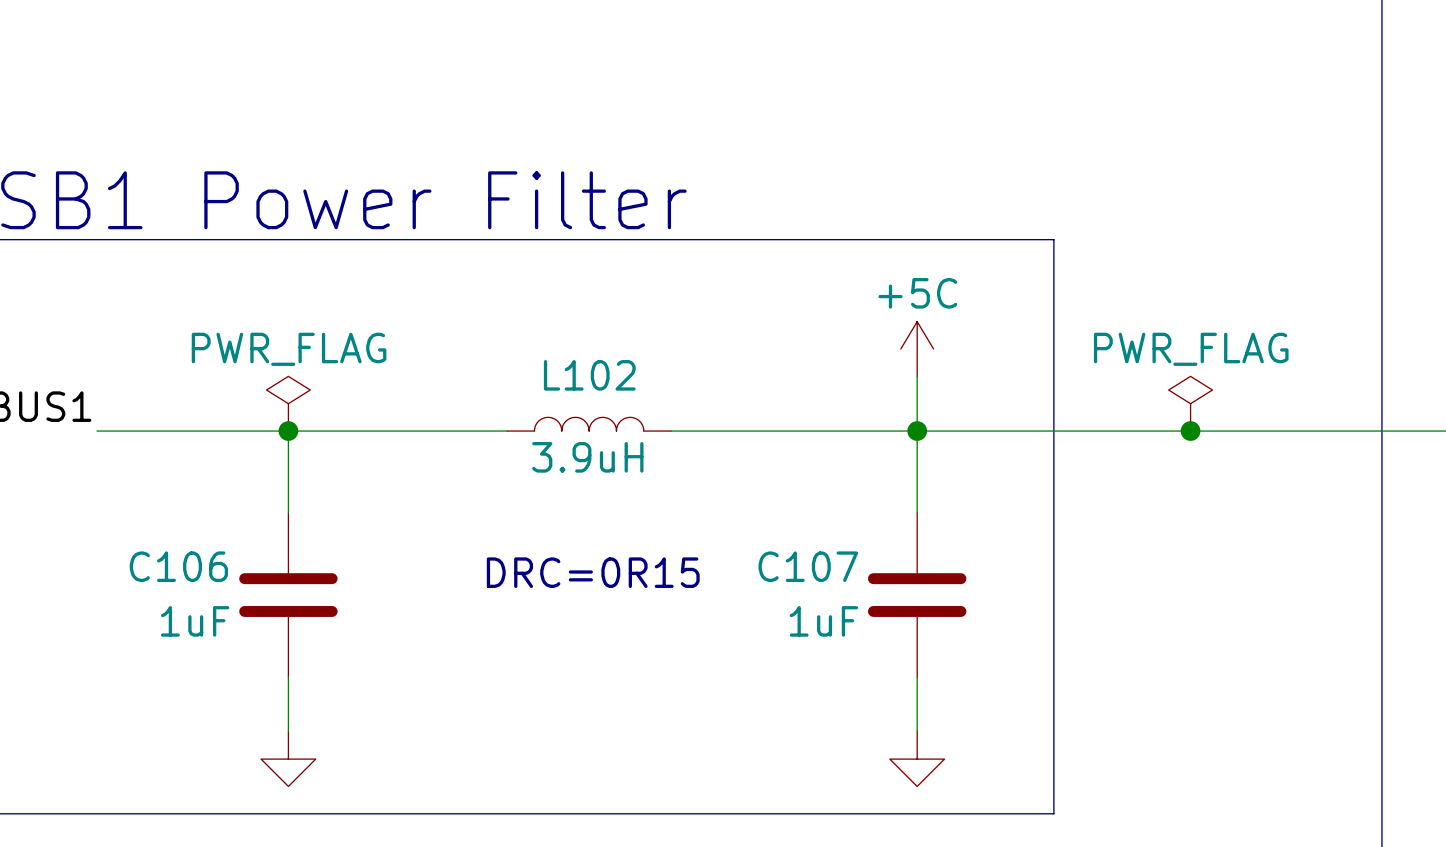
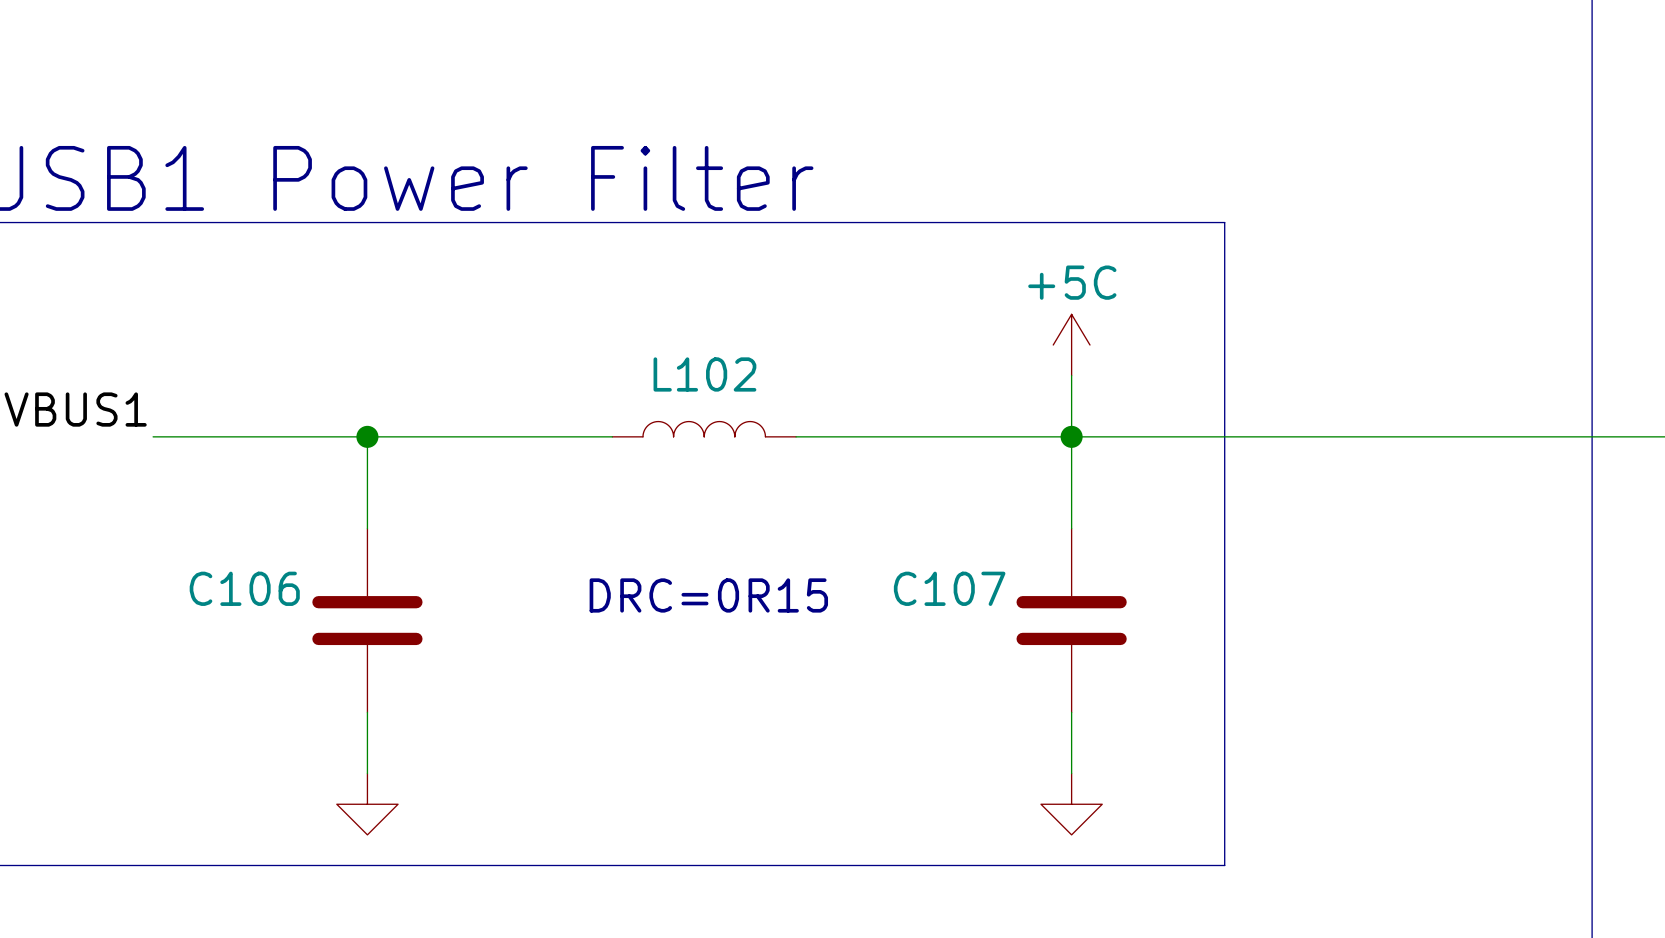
power symbol: PWR_FLAG (288, 403) -> none
power symbol: PWR_FLAG (1190, 403) -> none
junction: (1190, 431) -> none
L102 value: 3.9uH (587, 457) -> none
C106 value: 1uF (195, 621) -> none
C107 value: 1uF (823, 621) -> none

